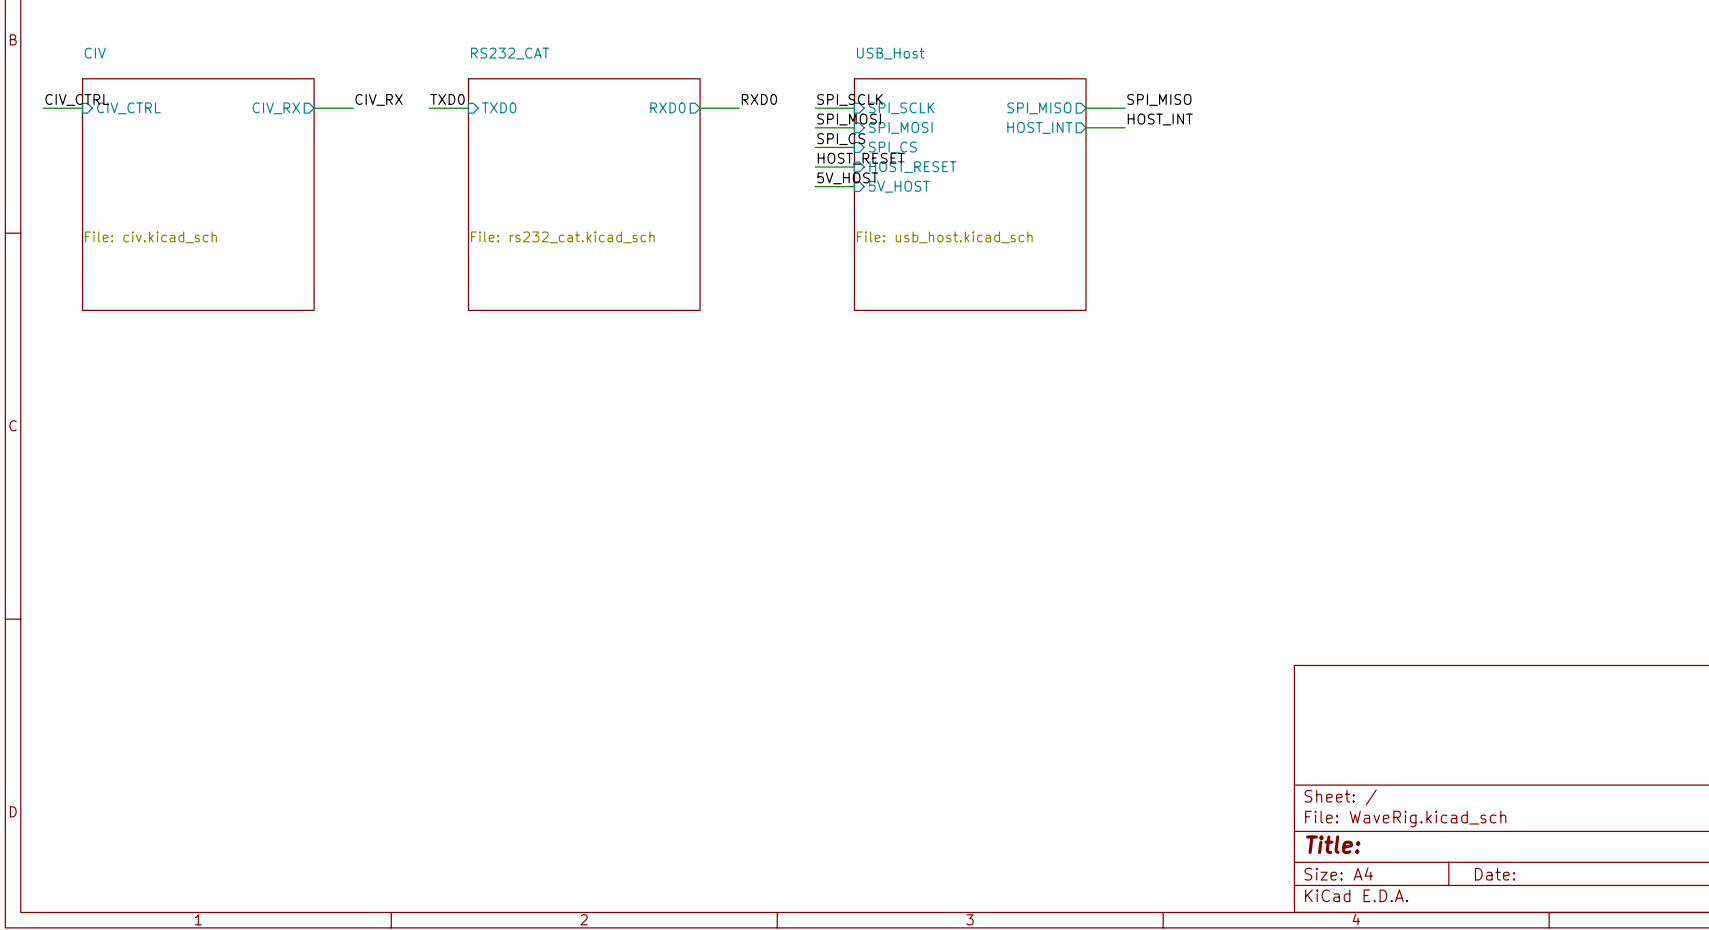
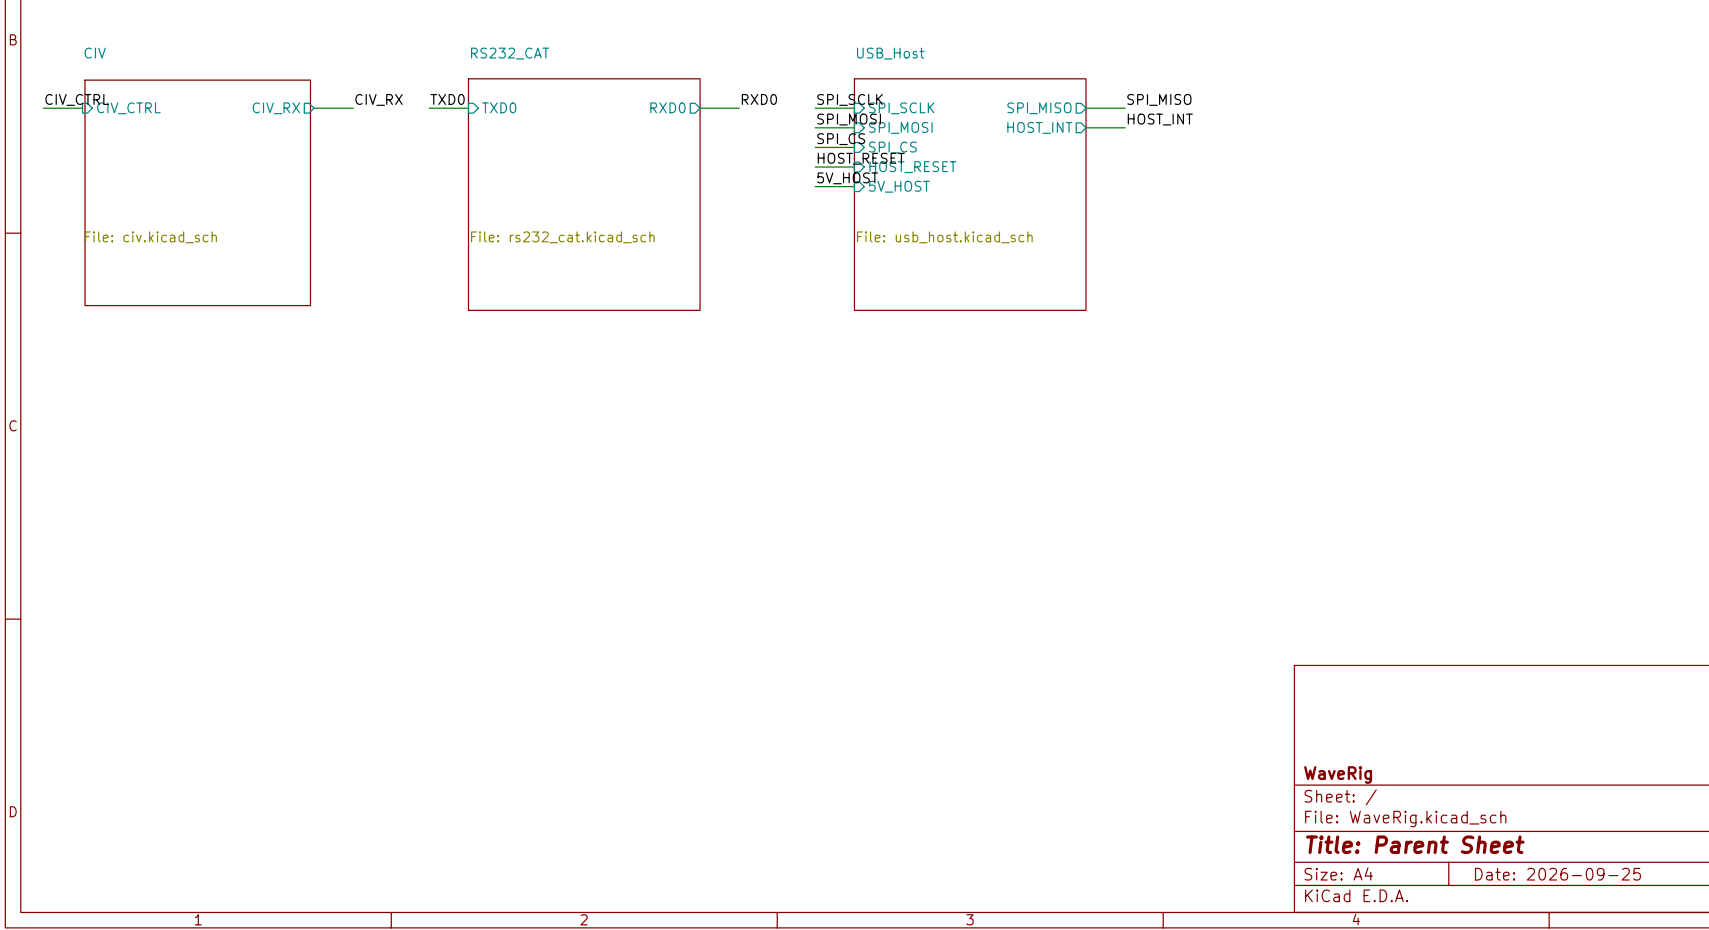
sheet CIV shape: [81, 78, 315, 311] -> [84, 79, 312, 307]
title block: none -> WaveRig (1338, 775)
title block: Title: (1333, 844) -> Title: Parent Sheet (1415, 844)
title block: Date: (1495, 874) -> Date: 2026-09-25 (1557, 874)

